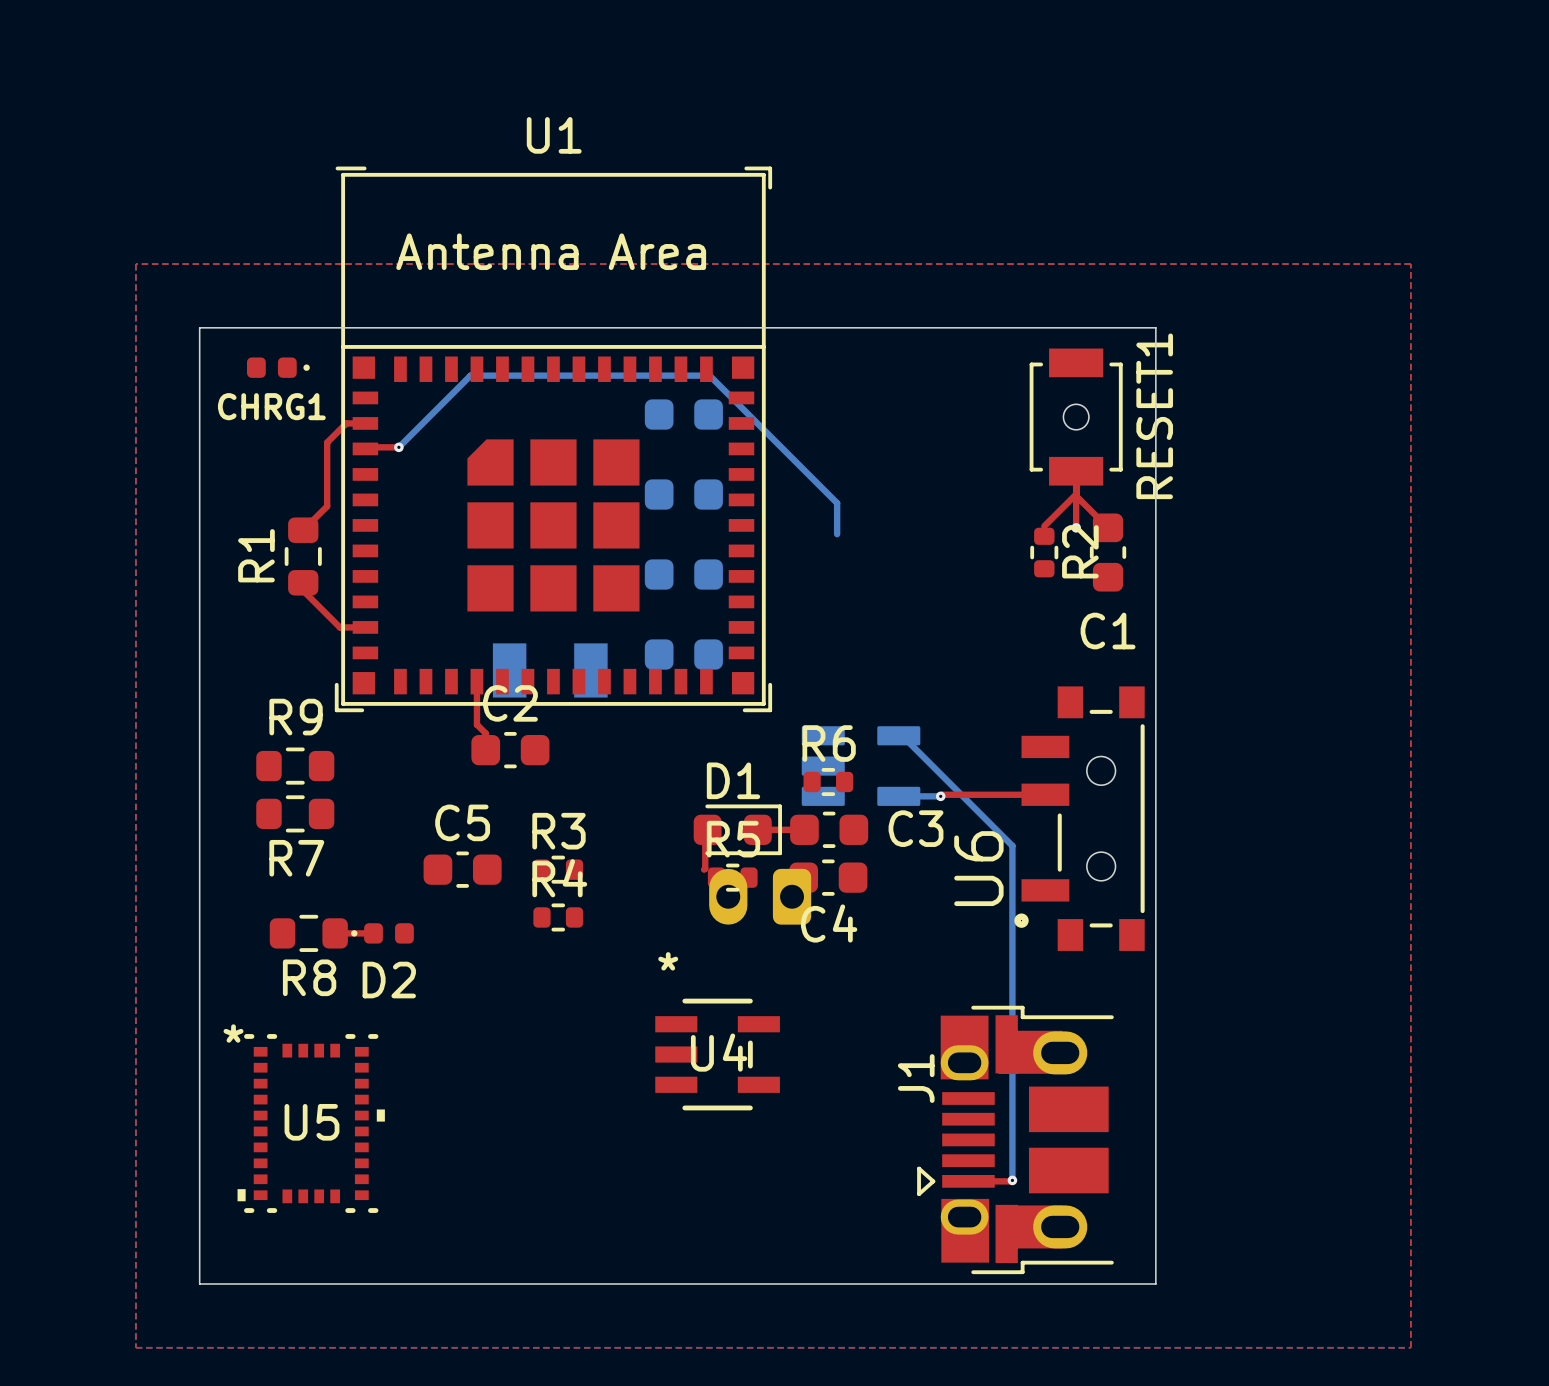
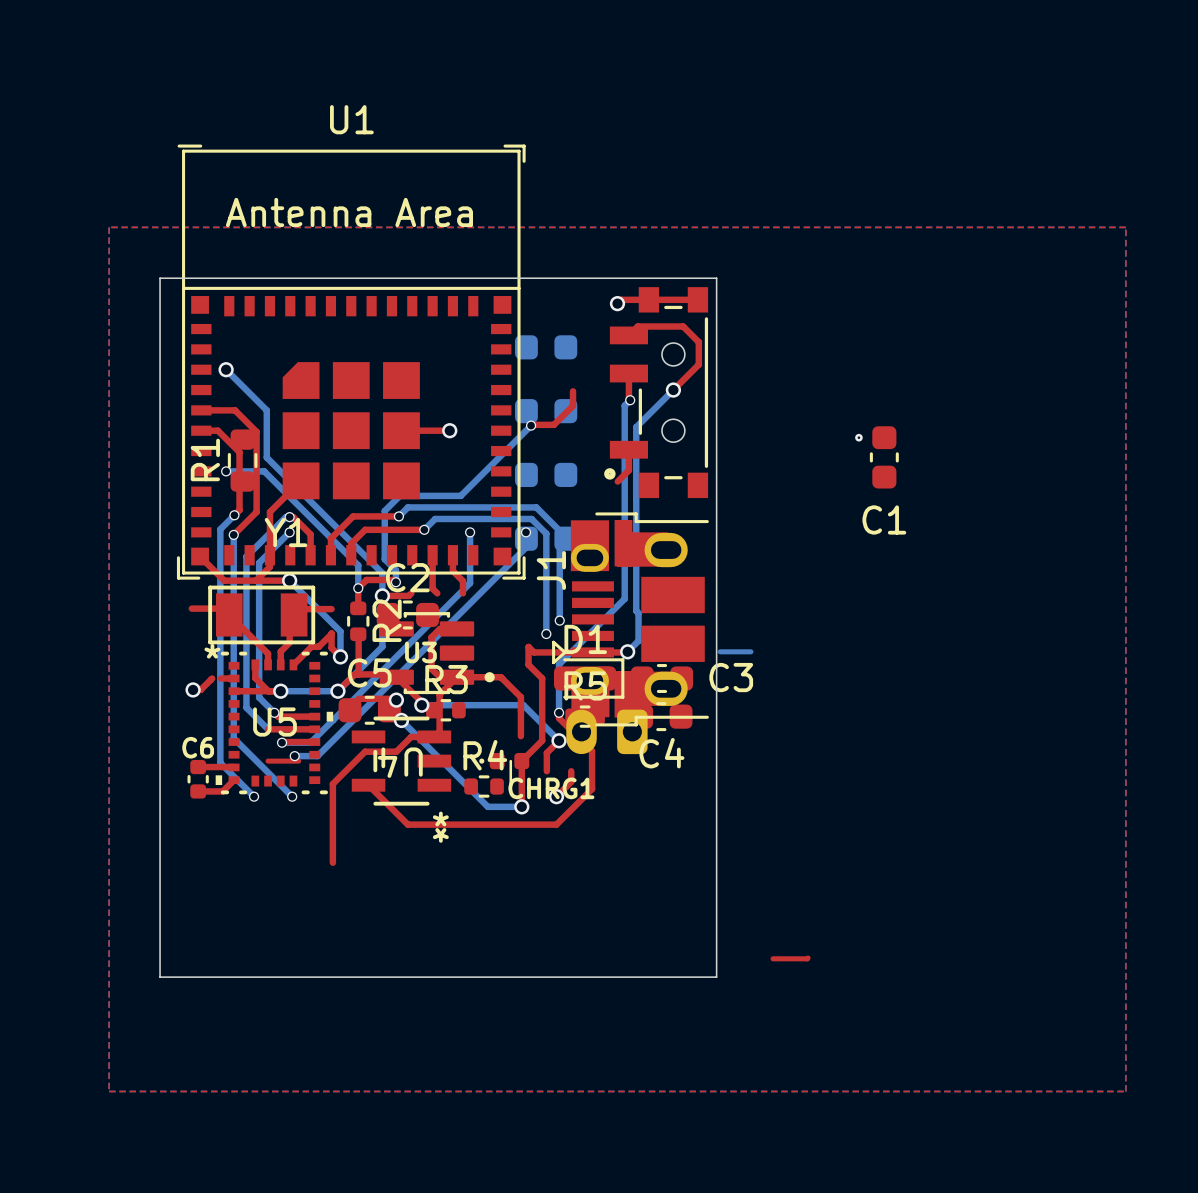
board edge: (897, 327) (1155, 327) (1155, 1284) (199, 1284) (199, 1204) -> (716, 278) (716, 977) (160, 977)
top track: none -> (697, 299) (621, 299) (617, 303)
via: none -> (617, 303)
CHRG1 rotation: 0° (278, 367) -> 180° (504, 761)
CHRG1 position: (278, 367) -> (504, 761)
top track: none -> (628, 335) (637, 326) (683, 326) (698, 342) (698, 364) (673, 390)
CHRG1 name position: CHRG1 (271, 406) -> CHRG1 (551, 788)
RESET1: (1076, 417) -> none
top track: (365, 423) (346, 423) (327, 442) (327, 506) (303, 530) -> none
U1 position: (553, 439) -> (351, 362)
bottom track: none -> (226, 369) (266, 410) (266, 457) (382, 573) (382, 646) (337, 691) (280, 691)
via: none -> (226, 369)
top track: (398, 447) (367, 447) (365, 448) -> none
bottom track: (398, 447) (470, 375) (709, 375) (837, 503) (837, 534) -> none
via: (398, 447) -> none
top track: none -> (628, 373) (630, 400)
bottom track: none -> (673, 390) (636, 427) (636, 610) (638, 613) (638, 640) (627, 651)
via: none -> (673, 390)
top track: none -> (573, 391) (573, 405) (553, 424) (531, 425)
part: none -> (656, 392)
top track: (1076, 471) (1076, 527) -> none
bottom track: none -> (630, 400) (624, 405) (624, 598) (559, 664) (559, 712)
via: none -> (630, 400)
top track: none -> (201, 410) (235, 410) (256, 431) (256, 512) (233, 534)
top track: (1076, 494) (1044, 526) -> none
top track: (1076, 495) (1108, 527) -> none
bottom track: none -> (531, 425) (460, 495) (399, 495) (384, 510) (384, 559) (395, 570) (395, 582)
via: none -> (531, 425)
top track: none -> (201, 430) (217, 430) (239, 452) (239, 510) (234, 515)
top track: none -> (401, 430) (449, 430)
via: none -> (449, 430)
top track: none -> (628, 449) (628, 470) (617, 481)
R2 position: (1044, 552) -> (358, 621)
bottom track: none -> (226, 471) (264, 471) (358, 565) (358, 588)
via: none -> (226, 471)
top track: (303, 582) (303, 590) (339, 627) (362, 627) -> none
top track: none -> (301, 480) (269, 512) (269, 566) (256, 580)
bottom track: none -> (234, 515) (220, 529) (220, 762) (254, 796)
via: none -> (234, 515)
top track: none -> (398, 516) (353, 516) (330, 538) (330, 555)
bottom track: none -> (398, 516) (407, 507) (536, 507) (559, 530) (559, 620)
via: none -> (398, 516)
bottom track: none -> (289, 517) (285, 517) (246, 556) (246, 707) (268, 729)
via: none -> (289, 517)
top track: none -> (292, 517) (310, 534) (310, 555)
top track: none -> (424, 529) (365, 529) (351, 543) (351, 555)
bottom track: none -> (424, 529) (435, 518) (531, 518) (546, 533) (546, 634)
via: none -> (424, 529)
bottom track: none -> (289, 532) (259, 562) (259, 697) (274, 712)
via: none -> (289, 532)
bottom track: none -> (470, 532) (470, 583) (310, 742) (282, 742)
via: none -> (470, 532)
bottom track: none -> (526, 532) (526, 547) (317, 756) (294, 756)
via: none -> (526, 532)
bottom track: none -> (233, 534) (233, 738) (292, 796)
via: none -> (233, 534)
Y1 side: bottom (550, 670) -> top (261, 614)
top track: none -> (432, 555) (432, 588) (437, 593)
top track: none -> (452, 555) (452, 571) (462, 581) (462, 593)
top track: none -> (200, 556) (224, 580) (289, 580)
top track: (476, 681) (476, 724) (485, 733) (485, 750) -> none
bottom track: none -> (289, 580) (340, 631) (340, 656)
via: none -> (289, 580)
top track: none -> (395, 582) (393, 579) (366, 579) (358, 588) (358, 608)
via: none -> (395, 582)
via: none -> (358, 588)
top track: none -> (411, 593) (408, 595) (382, 595)
via: none -> (382, 595)
bottom track: (902, 735) (1012, 845) (1012, 1180) -> none
top track: none -> (191, 608) (222, 608) (268, 653) (268, 664)
top track: none -> (331, 609) (299, 609) (289, 619) (289, 642) (280, 651) (280, 664)
via: none -> (559, 620)
R9: (295, 766) -> none
U3 side: bottom (861, 766) -> top (437, 653)
top track: none -> (457, 628) (439, 628) (431, 637) (431, 668) (439, 677) (500, 677) (520, 697) (520, 736)
top track: none -> (331, 633) (331, 648) (340, 656)
top track: none -> (331, 634) (318, 646) (311, 646) (293, 664)
top track: none -> (358, 634) (358, 674)
via: none -> (546, 634)
R6: (828, 782) -> none
top track: (1045, 794) (942, 794) (940, 796) -> none
top track: none -> (627, 651) (534, 652) (528, 646) (528, 664) (542, 678) (542, 740) (521, 761) (521, 806)
via: none -> (627, 651)
via: (940, 796) -> none
via: none -> (340, 656)
top track: none -> (255, 664) (255, 678) (268, 691)
R7: (295, 813) -> none
U6: (1079, 818) -> none
top track: (705, 821) (704, 869) -> none
top track: none -> (457, 677) (439, 694) (439, 731) (434, 736) (411, 736) (396, 751) (365, 751) (332, 783) (332, 862)
top track: none -> (212, 678) (200, 689) (193, 689)
top track: none -> (221, 678) (234, 678)
via: none -> (193, 689)
top track: none -> (234, 691) (280, 691)
via: none -> (280, 691)
top track: none -> (337, 691) (354, 674) (393, 674) (421, 702) (421, 705)
via: none -> (337, 691)
top track: none -> (358, 698) (396, 700)
via: none -> (396, 700)
bottom track: none -> (421, 705) (523, 705) (559, 740)
via: none -> (421, 705)
top track: none -> (274, 712) (278, 716) (314, 716)
via: none -> (274, 712)
top track: none -> (559, 712) (559, 718) (592, 751) (592, 789) (556, 824) (407, 824) (368, 785)
via: none -> (559, 712)
bottom track: none -> (401, 720) (487, 806) (521, 806)
via: none -> (401, 720)
top track: none -> (268, 729) (314, 729)
top track: none -> (559, 740) (546, 752) (546, 771)
via: none -> (559, 740)
top track: none -> (314, 742) (282, 742)
via: none -> (282, 742)
R4 position: (558, 917) -> (484, 786)
via: none -> (294, 756)
R8: (308, 933) -> none
D2: (382, 933) -> none
line: none -> (510, 761) (510, 786)
top track: none -> (198, 767) (234, 767)
top track: none -> (571, 771) (571, 781) (556, 796)
C6: none -> (198, 779)
top track: none -> (234, 780) (222, 791) (198, 791)
via: none -> (254, 796)
via: none -> (292, 796)
via: none -> (556, 796)
via: none -> (521, 806)
U4 rotation: 0° (717, 1054) -> 180° (401, 761)
U4 position: (717, 1054) -> (401, 761)
U5 position: (311, 1123) -> (274, 722)
J1 position: (1015, 1139) -> (630, 619)
via: (1012, 1180) -> none

